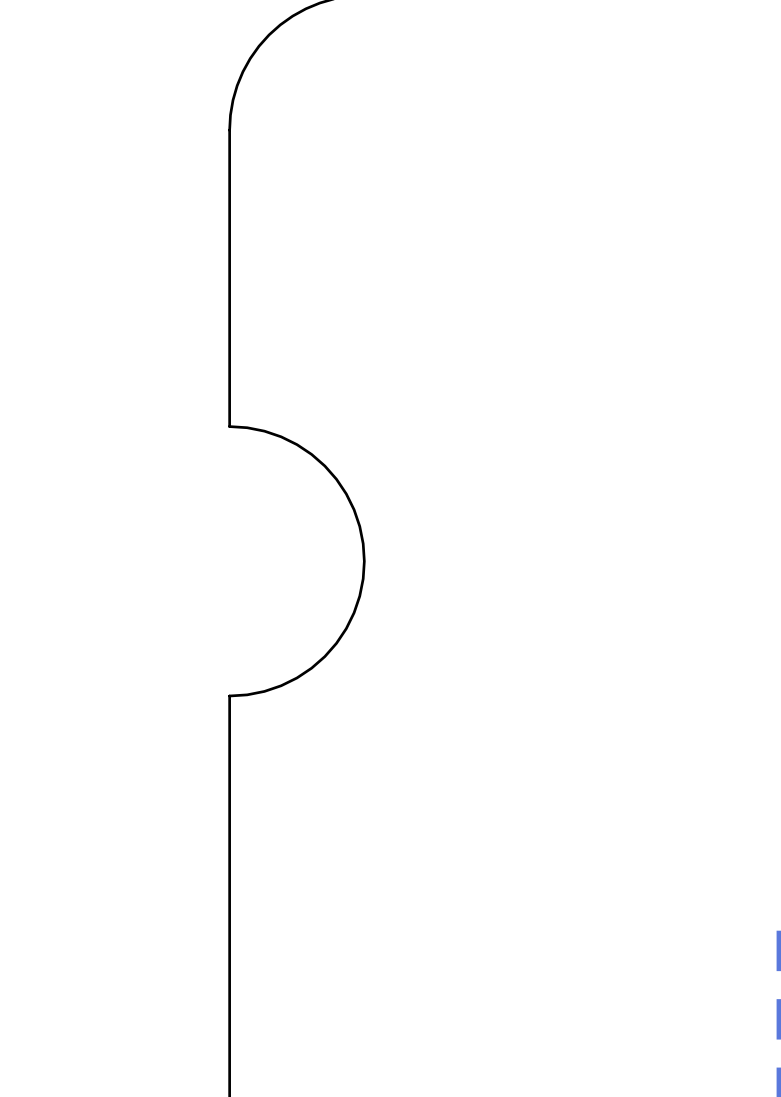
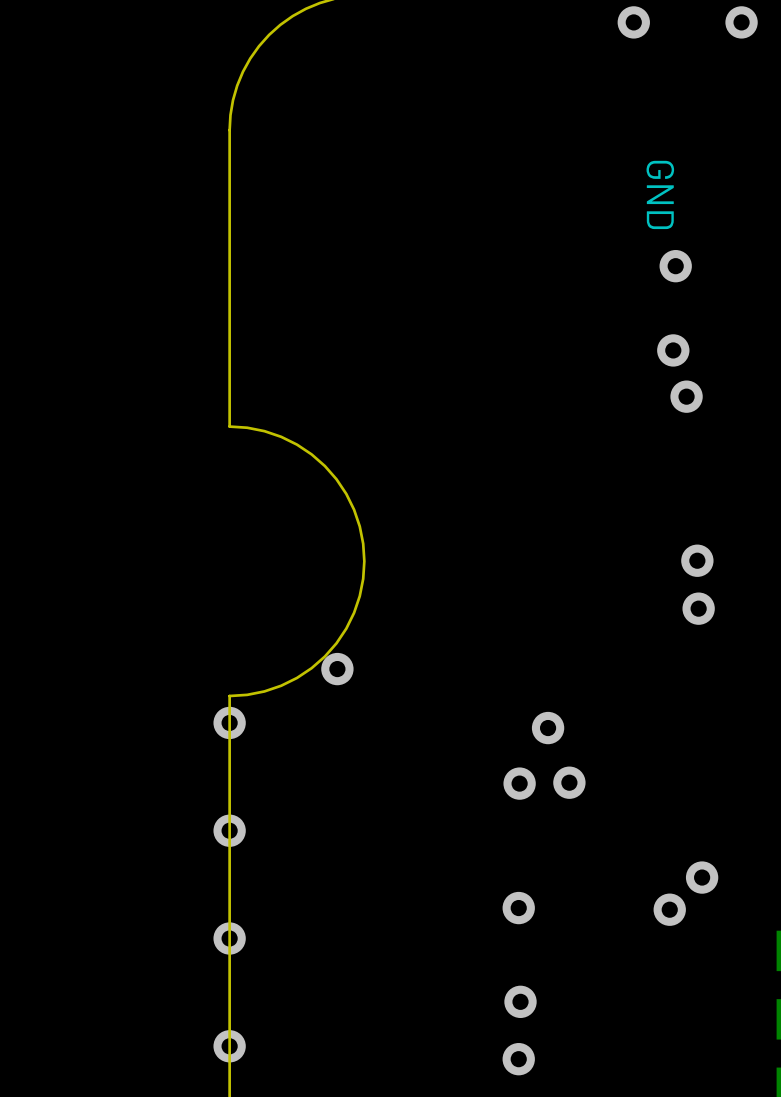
via: none -> (633, 22)
via: none -> (741, 22)
text: none -> GND (660, 194)
via: none -> (675, 266)
via: none -> (673, 350)
via: none -> (686, 396)
via: none -> (697, 560)
via: none -> (698, 608)
via: none -> (337, 669)
via: none -> (229, 722)
via: none -> (548, 728)
via: none -> (569, 782)
via: none -> (519, 783)
via: none -> (229, 830)
via: none -> (702, 877)
via: none -> (518, 908)
via: none -> (669, 909)
via: none -> (229, 938)
via: none -> (520, 1001)
via: none -> (229, 1046)
via: none -> (518, 1059)

